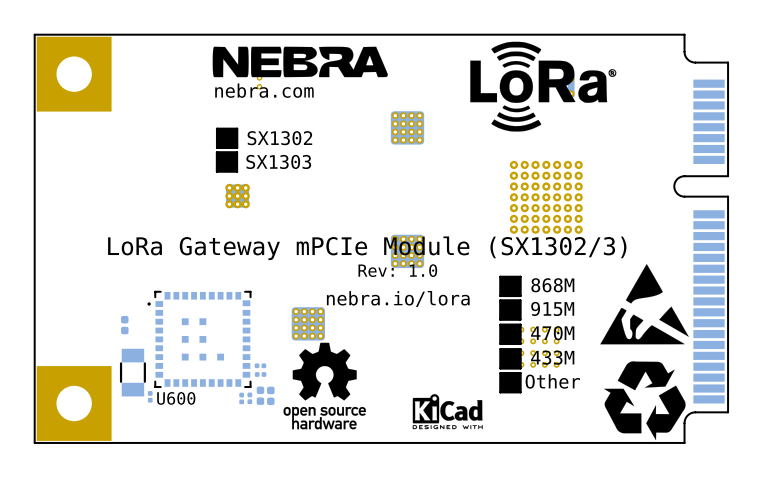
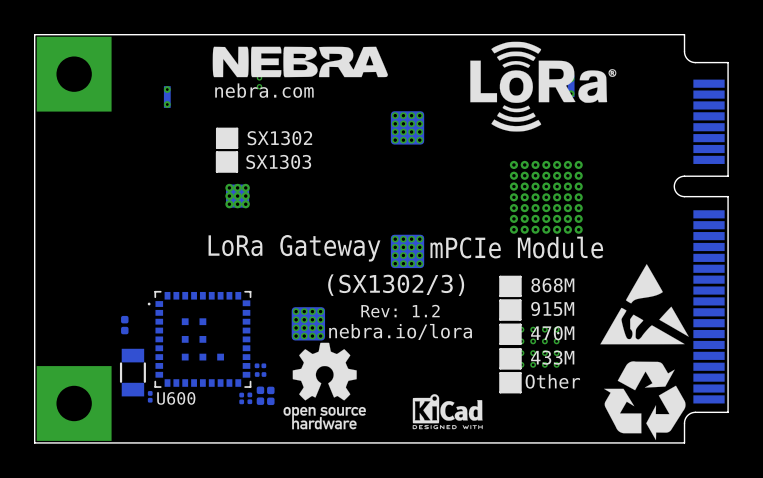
part: none -> (167, 97)
text: none -> mPCIe Module (516, 247)
text: none -> LoRa Gateway (294, 248)
text: LoRa Gateway mPCIe Module (SX1302/3) (367, 248) -> none
text: Rev: 1.0 (397, 270) -> (SX1302/3) (396, 285)
text position: nebra.io/lora (398, 298) -> nebra.io/lora (400, 331)
text: none -> Rev: 1.2 (400, 311)

